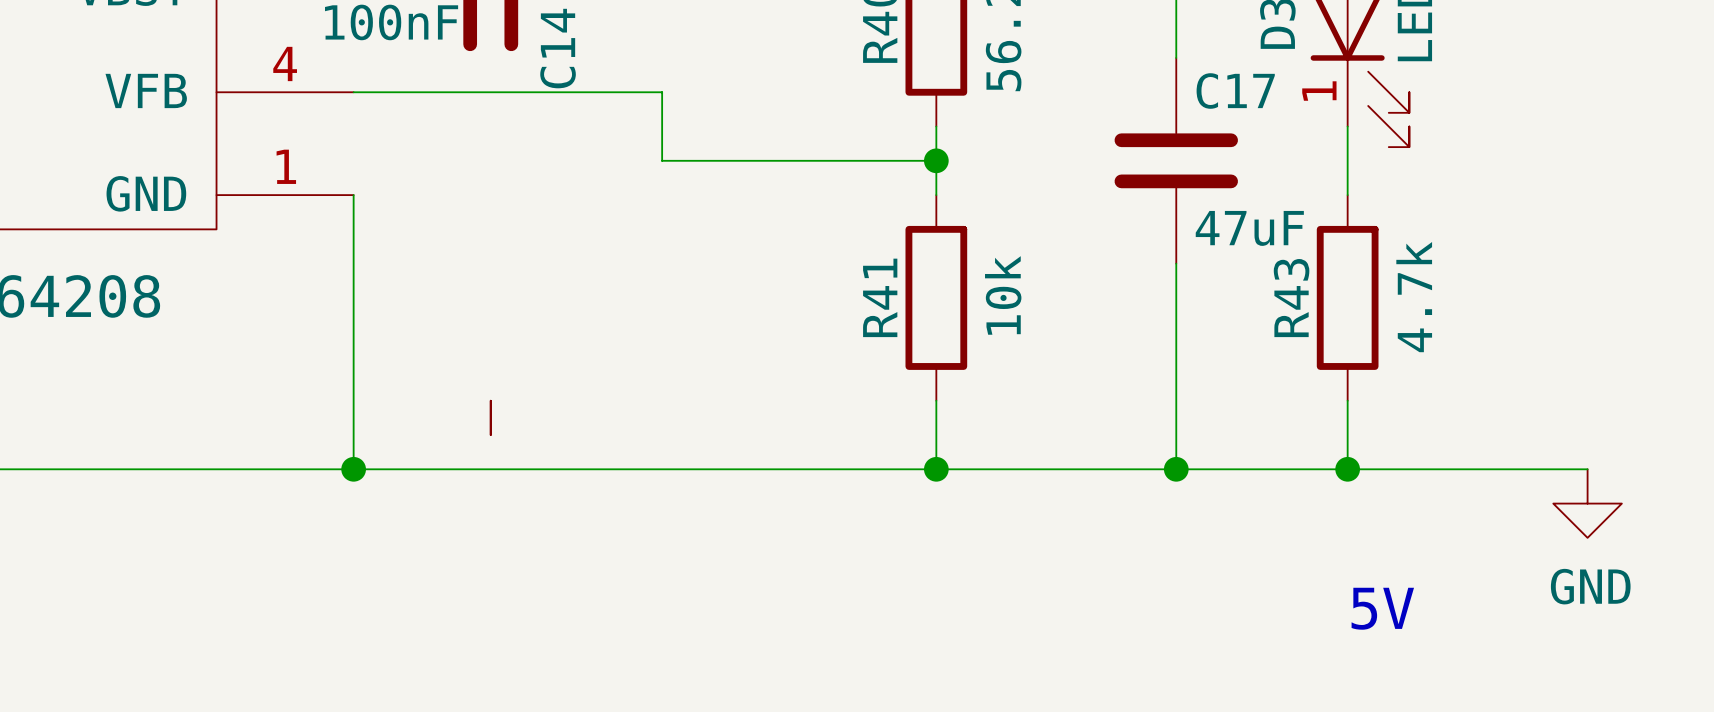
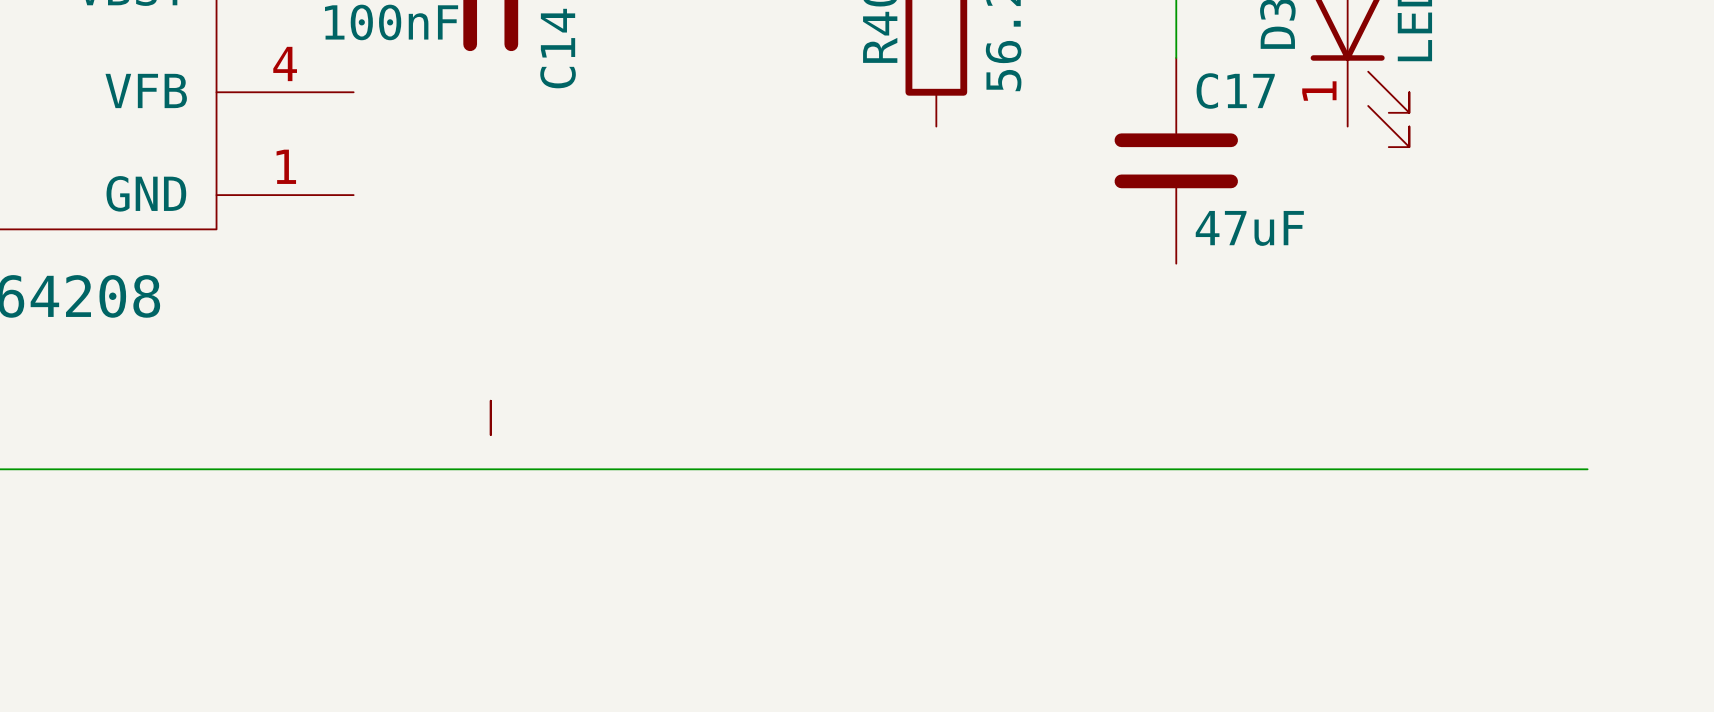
wire: (353, 92) (662, 92) (662, 160) (936, 160) -> none
wire: (936, 126) (936, 195) -> none
wire: (1347, 126) (1347, 195) -> none
junction: (936, 160) -> none
wire: (353, 195) (353, 469) -> none
wire: (1176, 263) (1176, 469) -> none
R41: 10k (936, 297) -> none
R43: 4.7k (1347, 297) -> none
wire: (936, 400) (936, 469) -> none
wire: (1347, 400) (1347, 469) -> none
junction: (353, 469) -> none
junction: (936, 469) -> none
junction: (1176, 469) -> none
junction: (1347, 469) -> none
power symbol: GND (1587, 503) -> none
text: 5V (1382, 608) -> none

